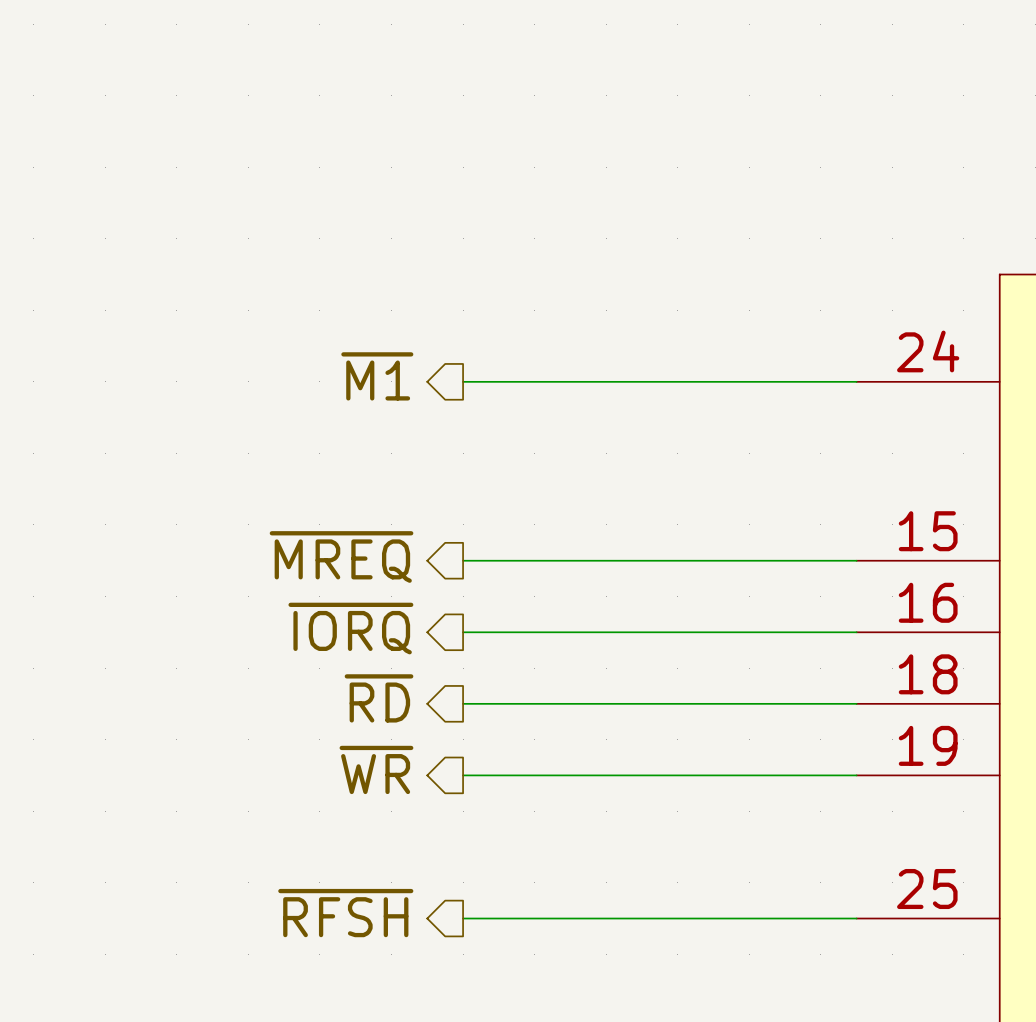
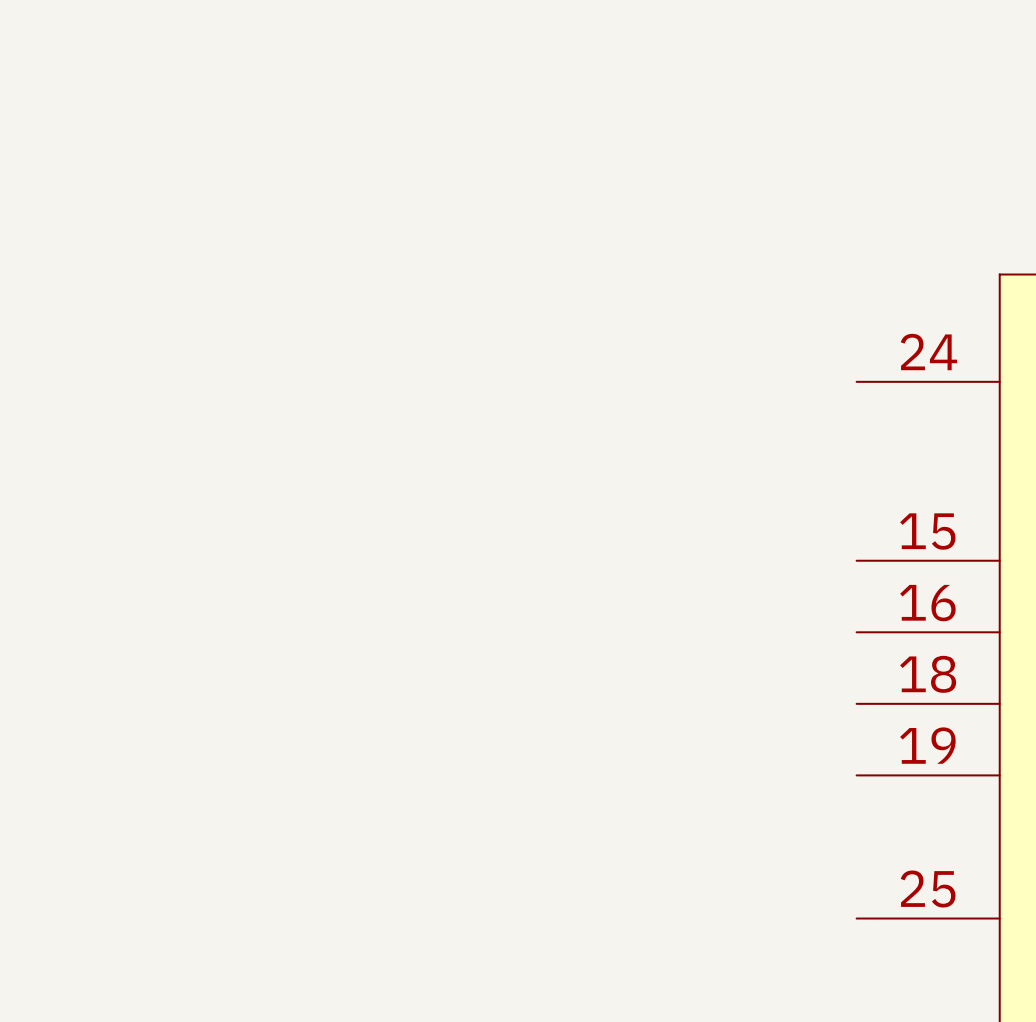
hierarchical label: ~{M1} (377, 376) -> none
wire: (463, 381) (856, 381) -> none
hierarchical label: ~{MREQ} (341, 556) -> none
wire: (463, 560) (856, 560) -> none
hierarchical label: ~{IORQ} (350, 628) -> none
wire: (463, 632) (856, 632) -> none
hierarchical label: ~{RD} (379, 698) -> none
wire: (463, 703) (856, 703) -> none
hierarchical label: ~{WR} (376, 769) -> none
wire: (463, 775) (856, 775) -> none
hierarchical label: ~{RFSH} (345, 913) -> none
wire: (463, 918) (856, 918) -> none

